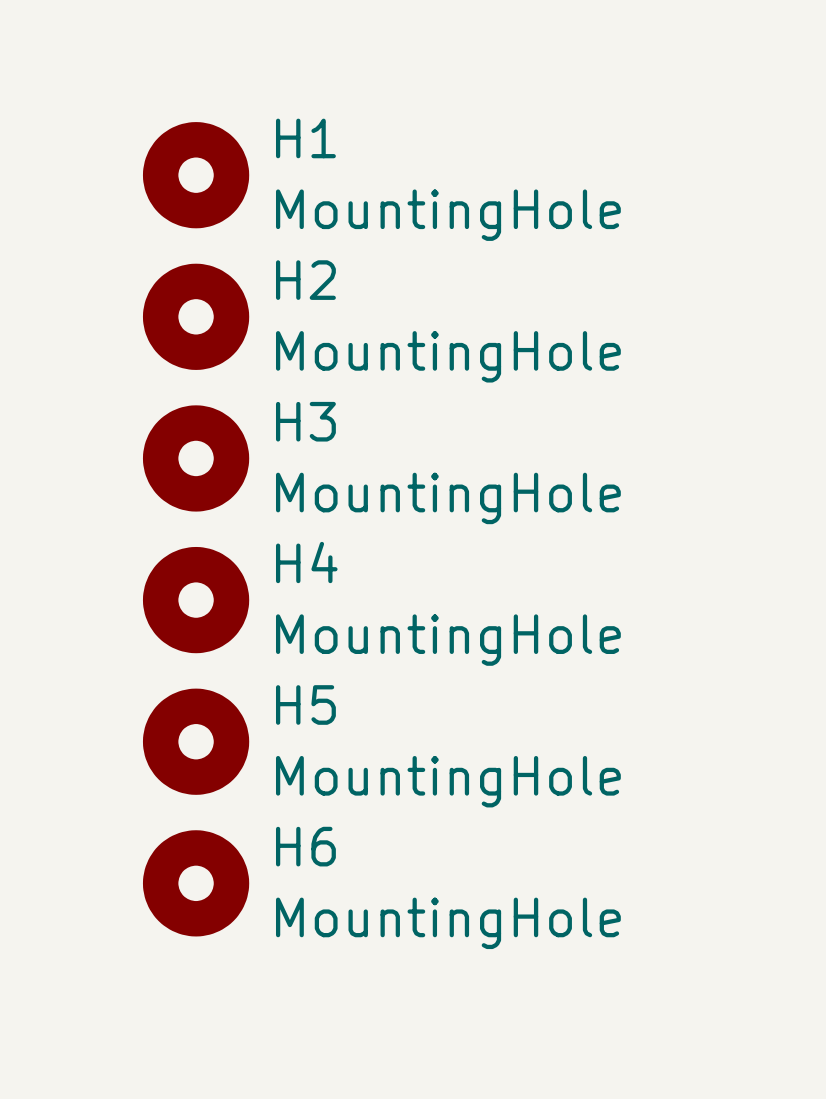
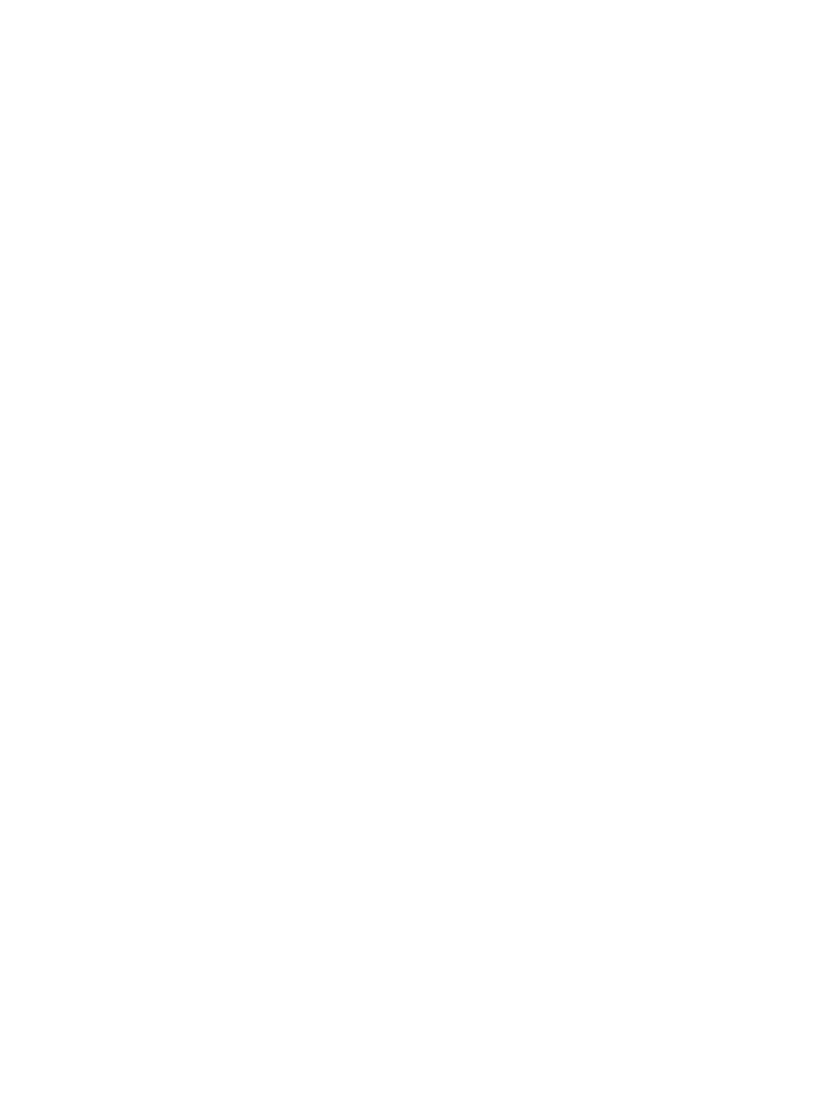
H1: MountingHole (196, 175) -> none
H2: MountingHole (196, 316) -> none
H3: MountingHole (196, 458) -> none
H4: MountingHole (196, 600) -> none
H5: MountingHole (196, 741) -> none
H6: MountingHole (196, 883) -> none

